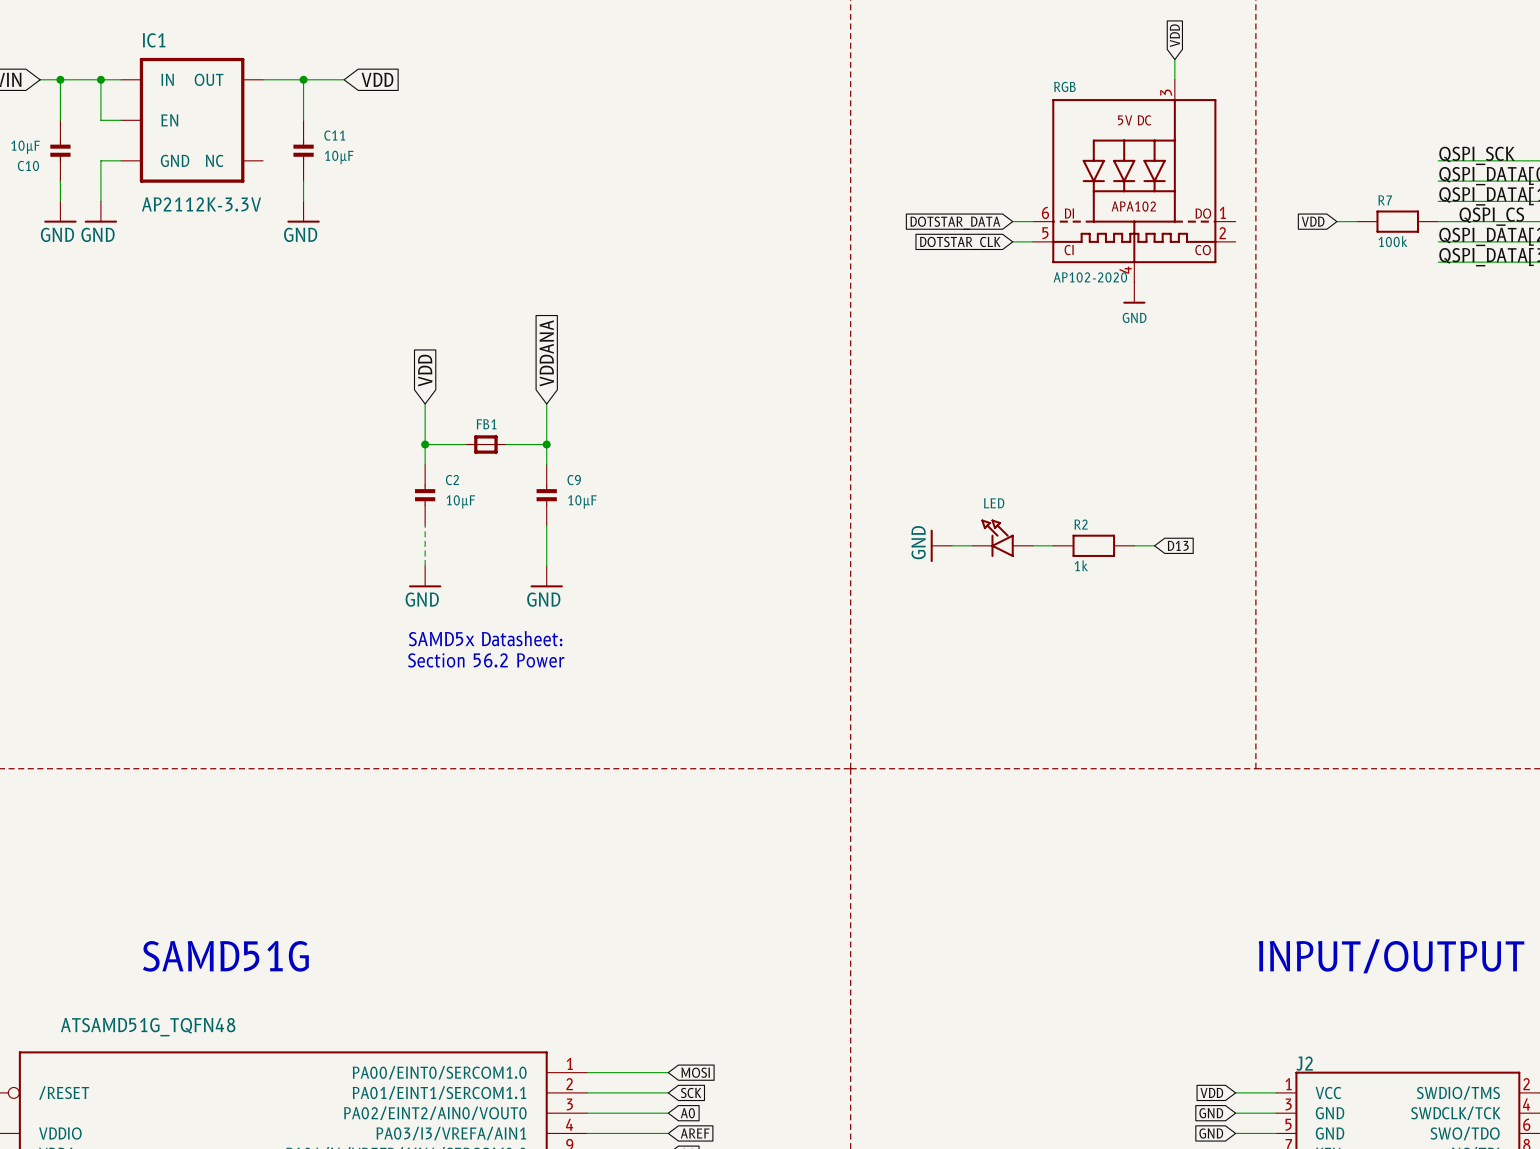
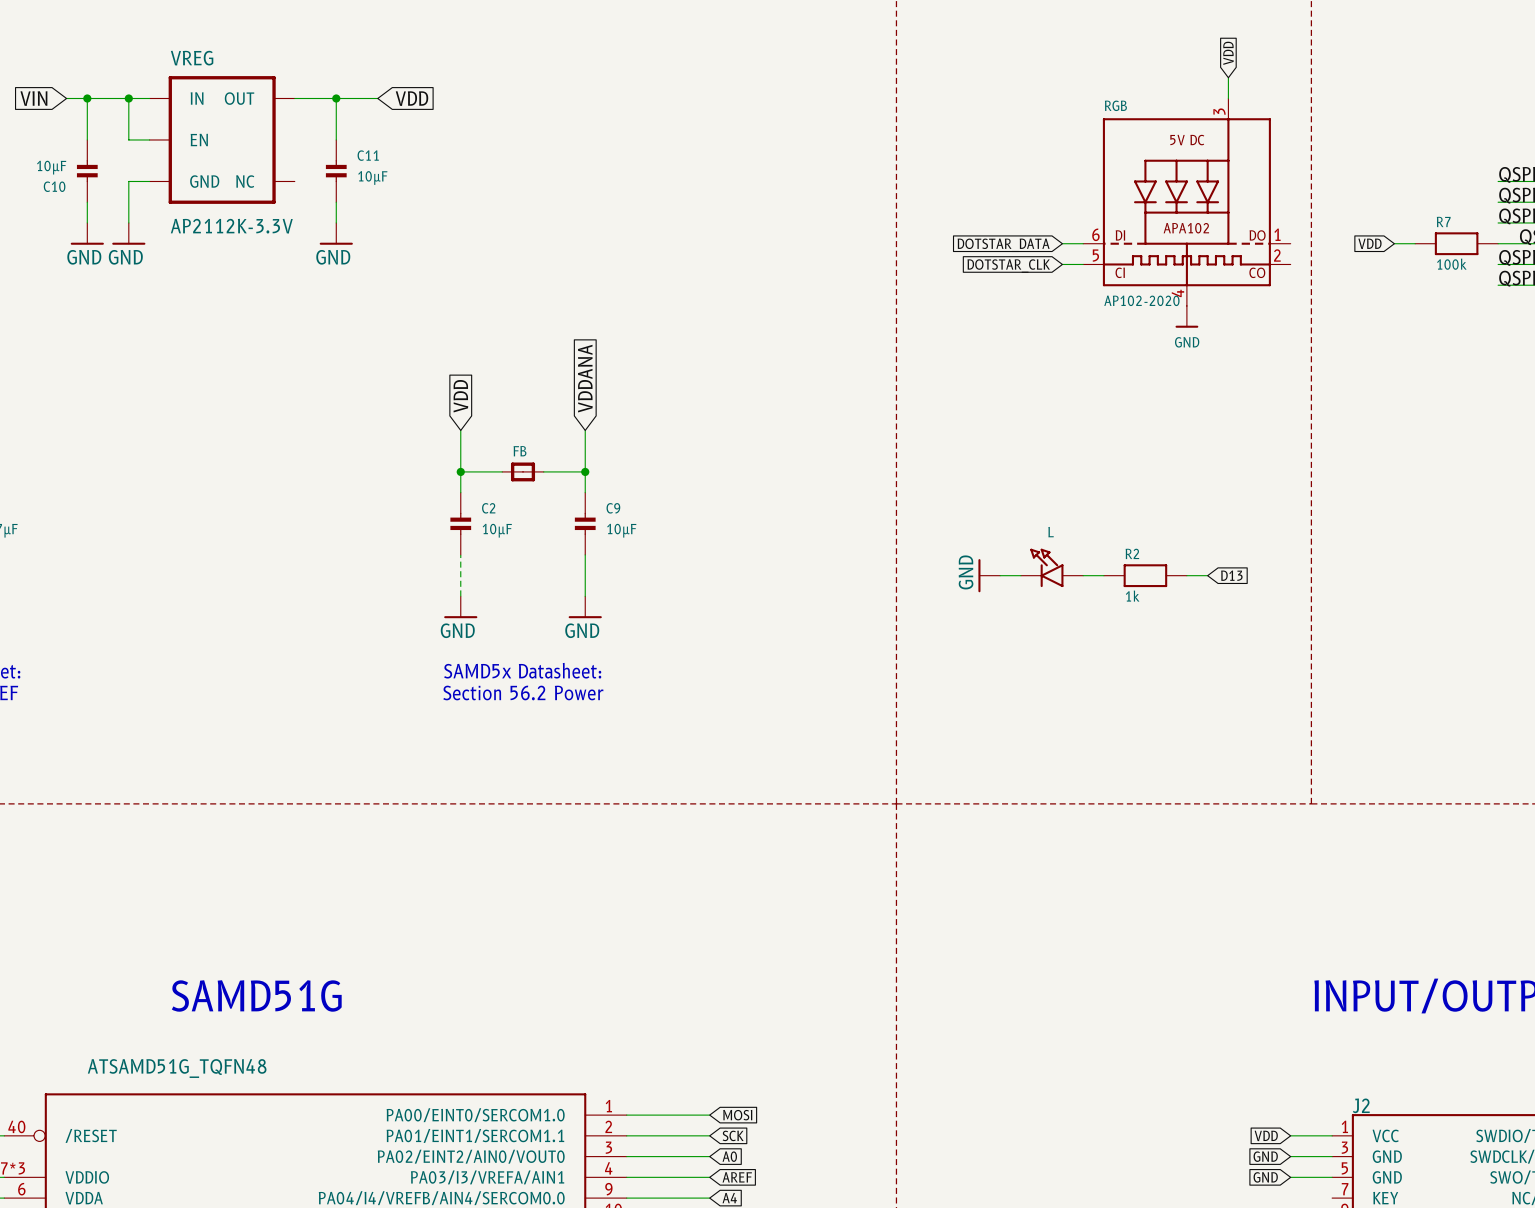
IC1 name: IC1 (154, 40) -> VREG (192, 58)
FB1 name: FB1 (486, 424) -> FB (520, 451)
LED name: LED (994, 503) -> L (1051, 532)

